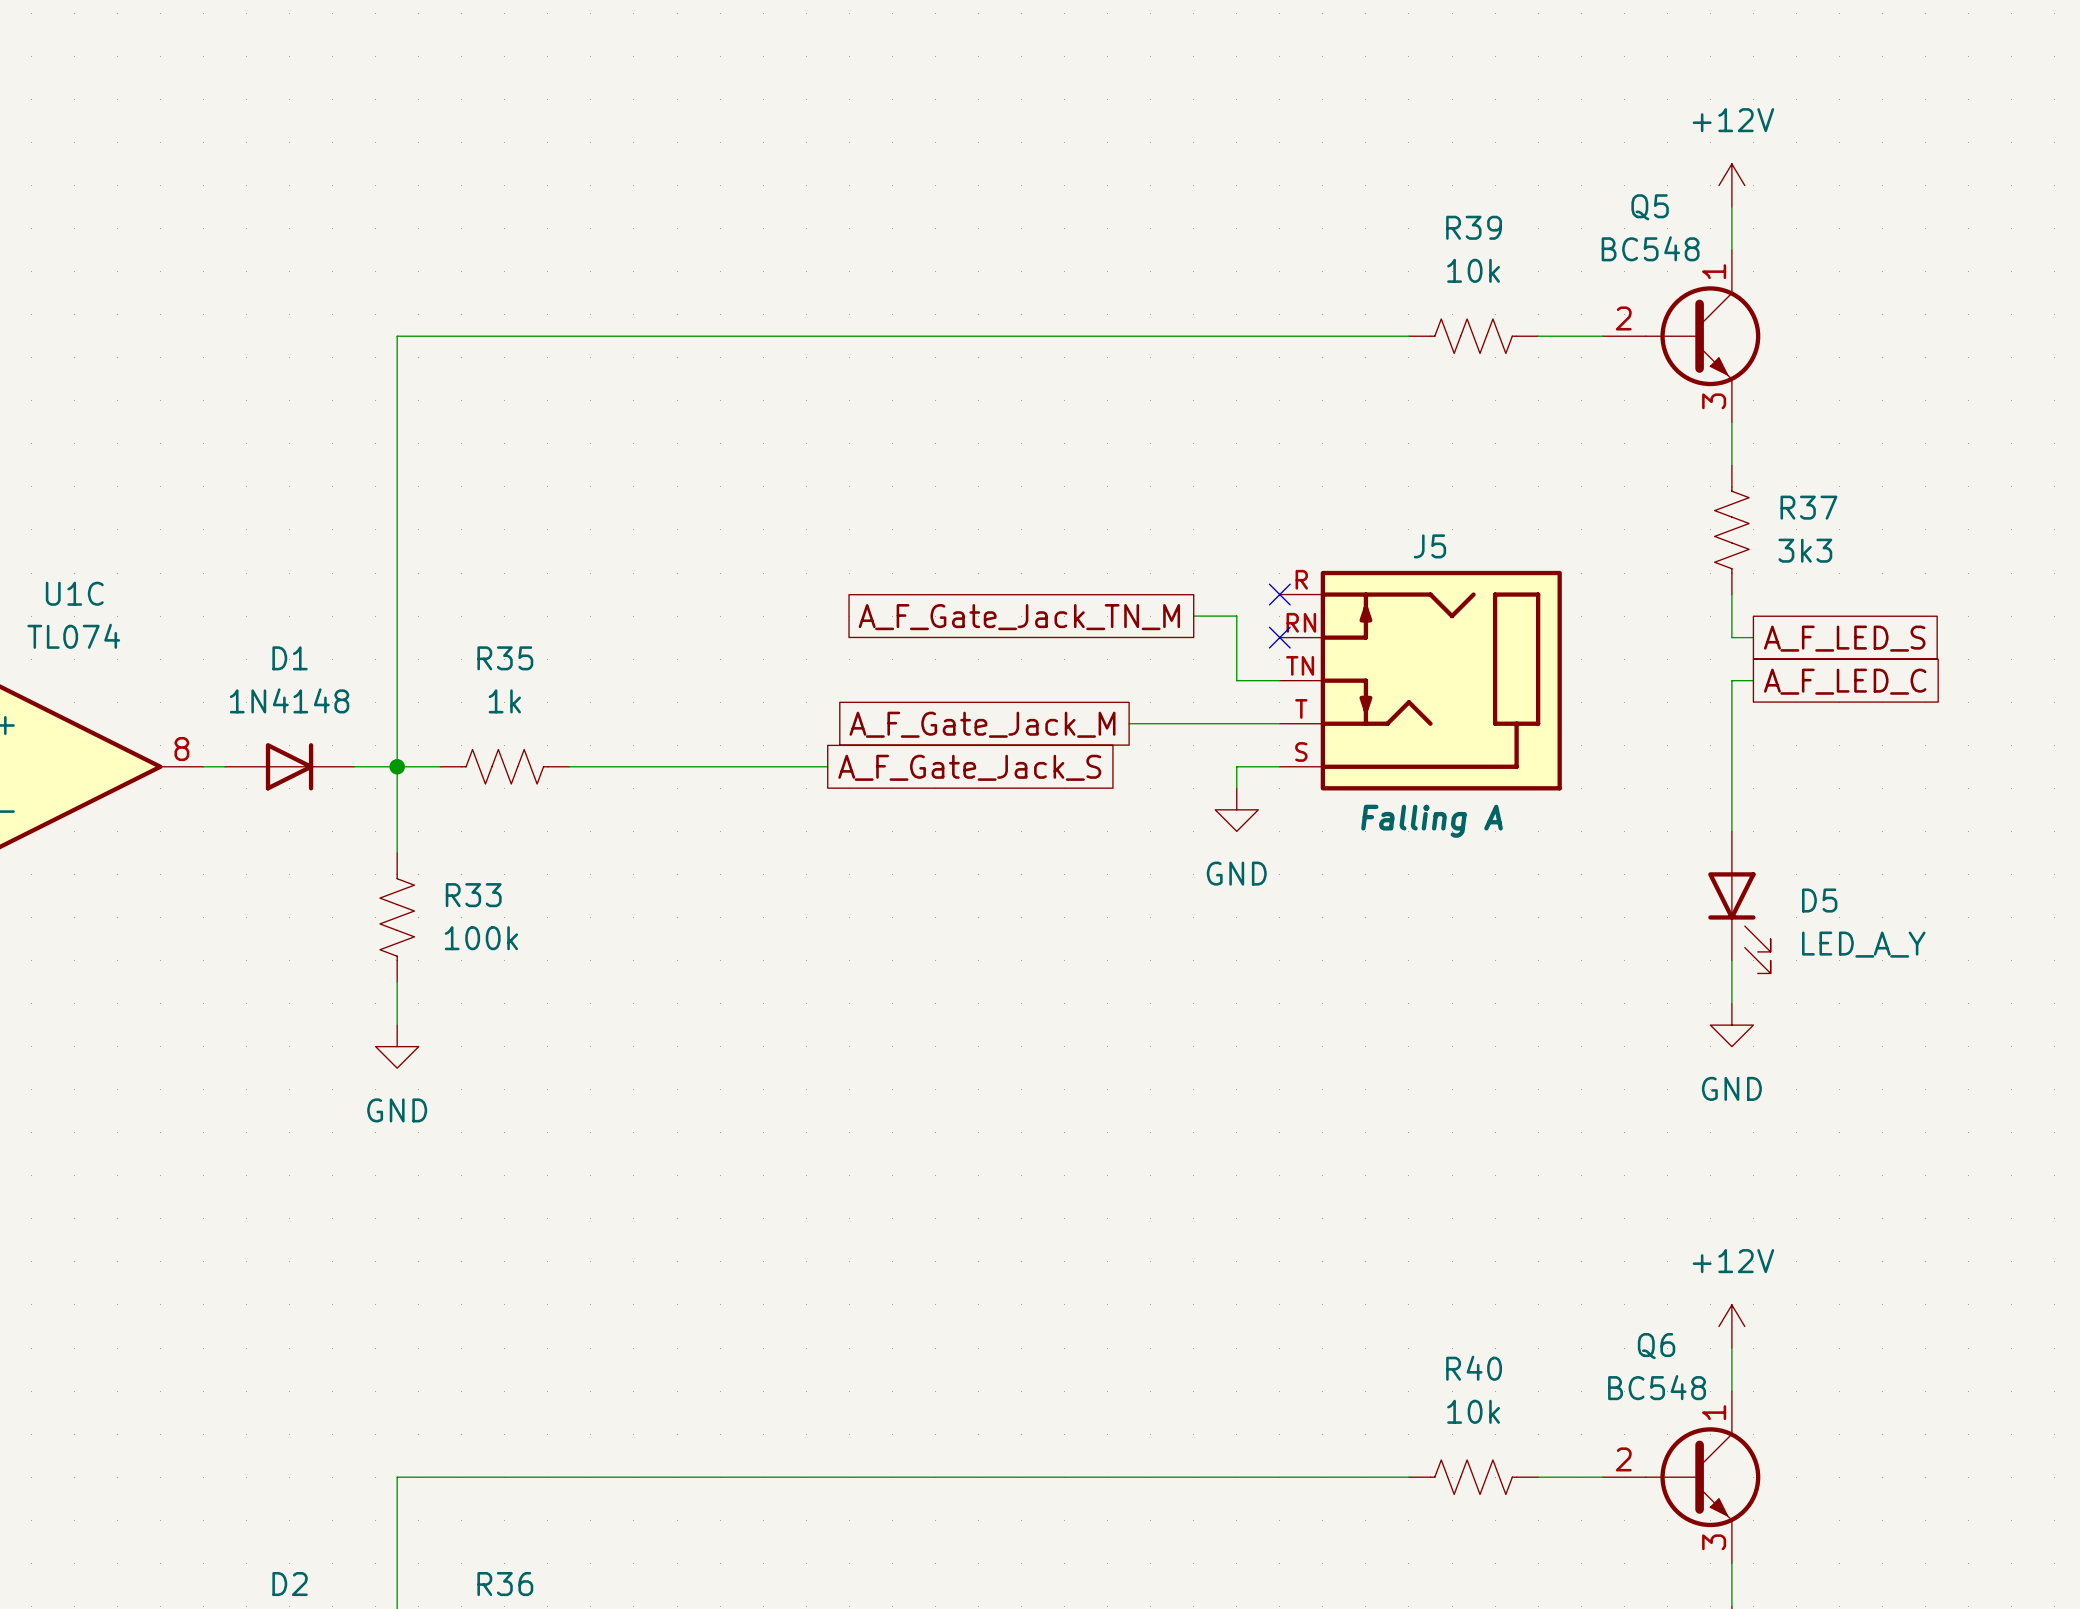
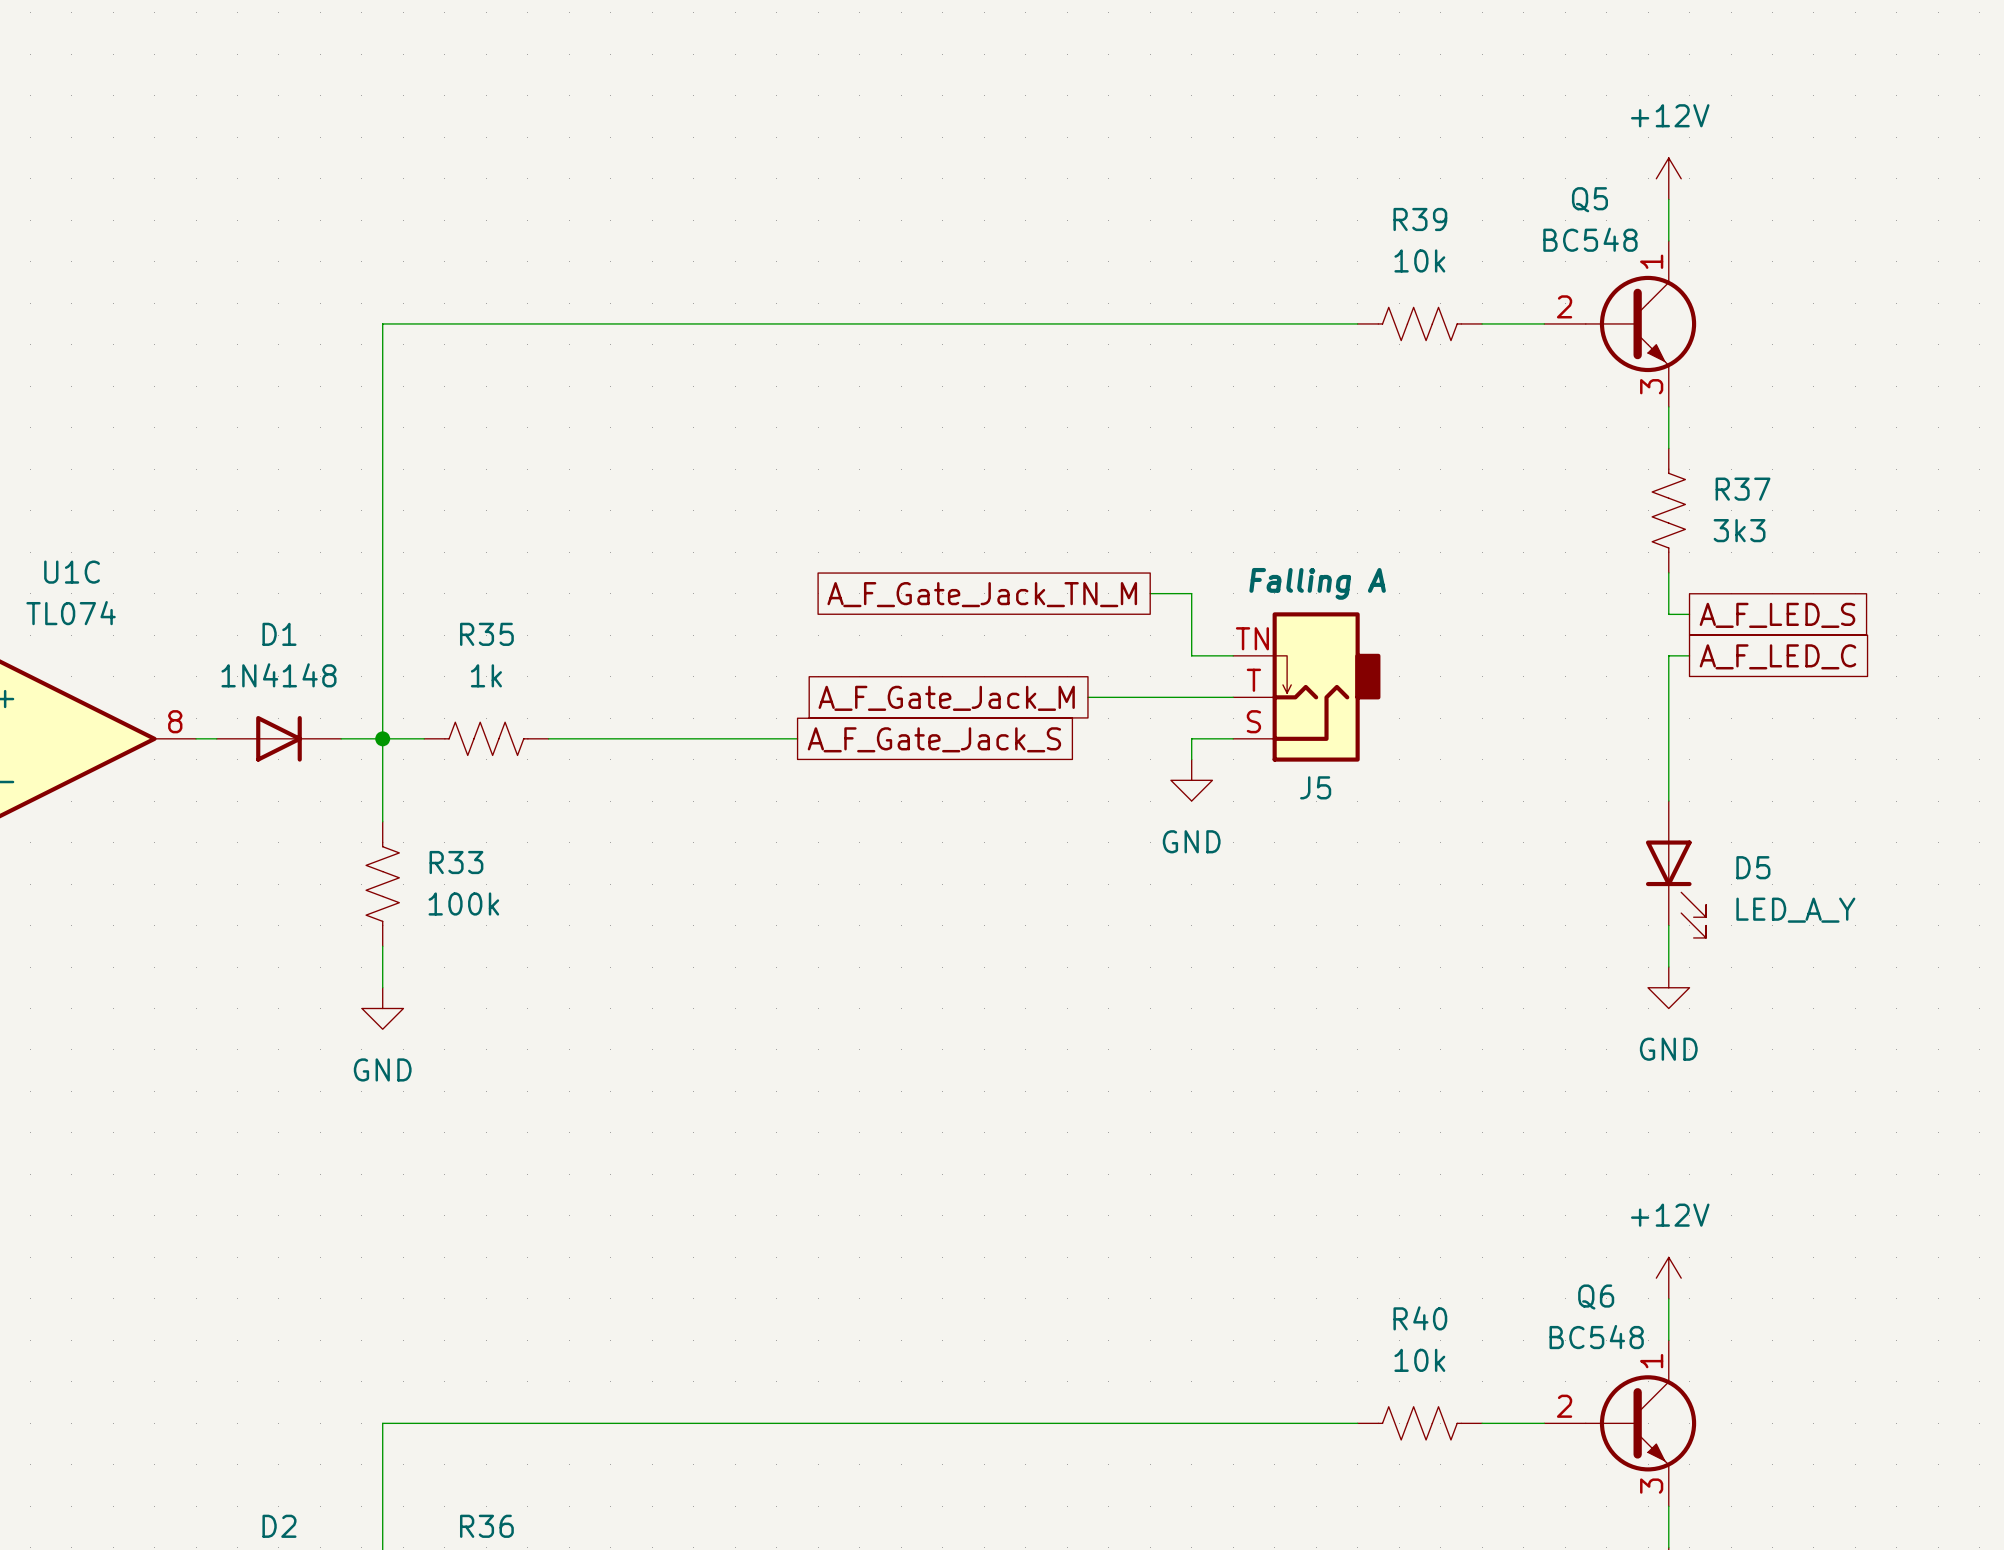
J5 name position: J5 (1429, 546) -> J5 (1315, 787)
J5 symbol: [1279, 570, 1562, 791] -> [1233, 612, 1381, 762]
no-connect mark: (1279, 594) -> none
no-connect mark: (1279, 637) -> none
J5 text position: Falling A (1432, 821) -> Falling A (1317, 583)

